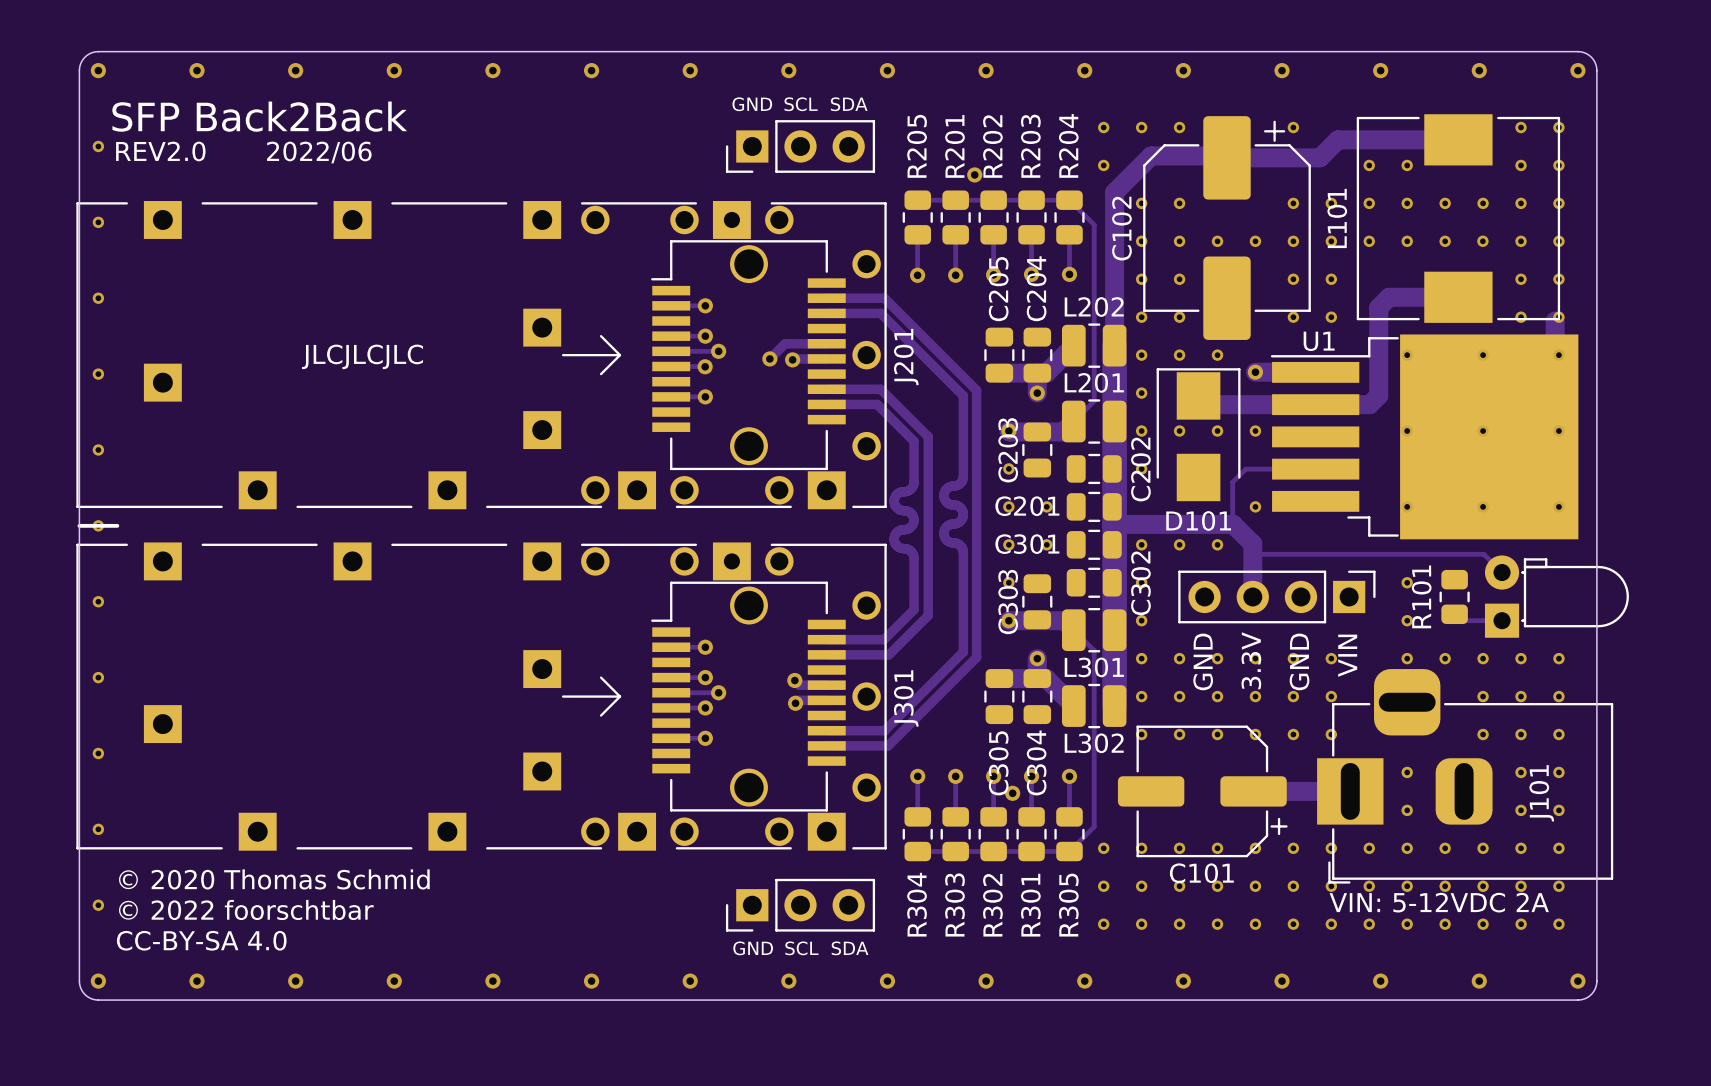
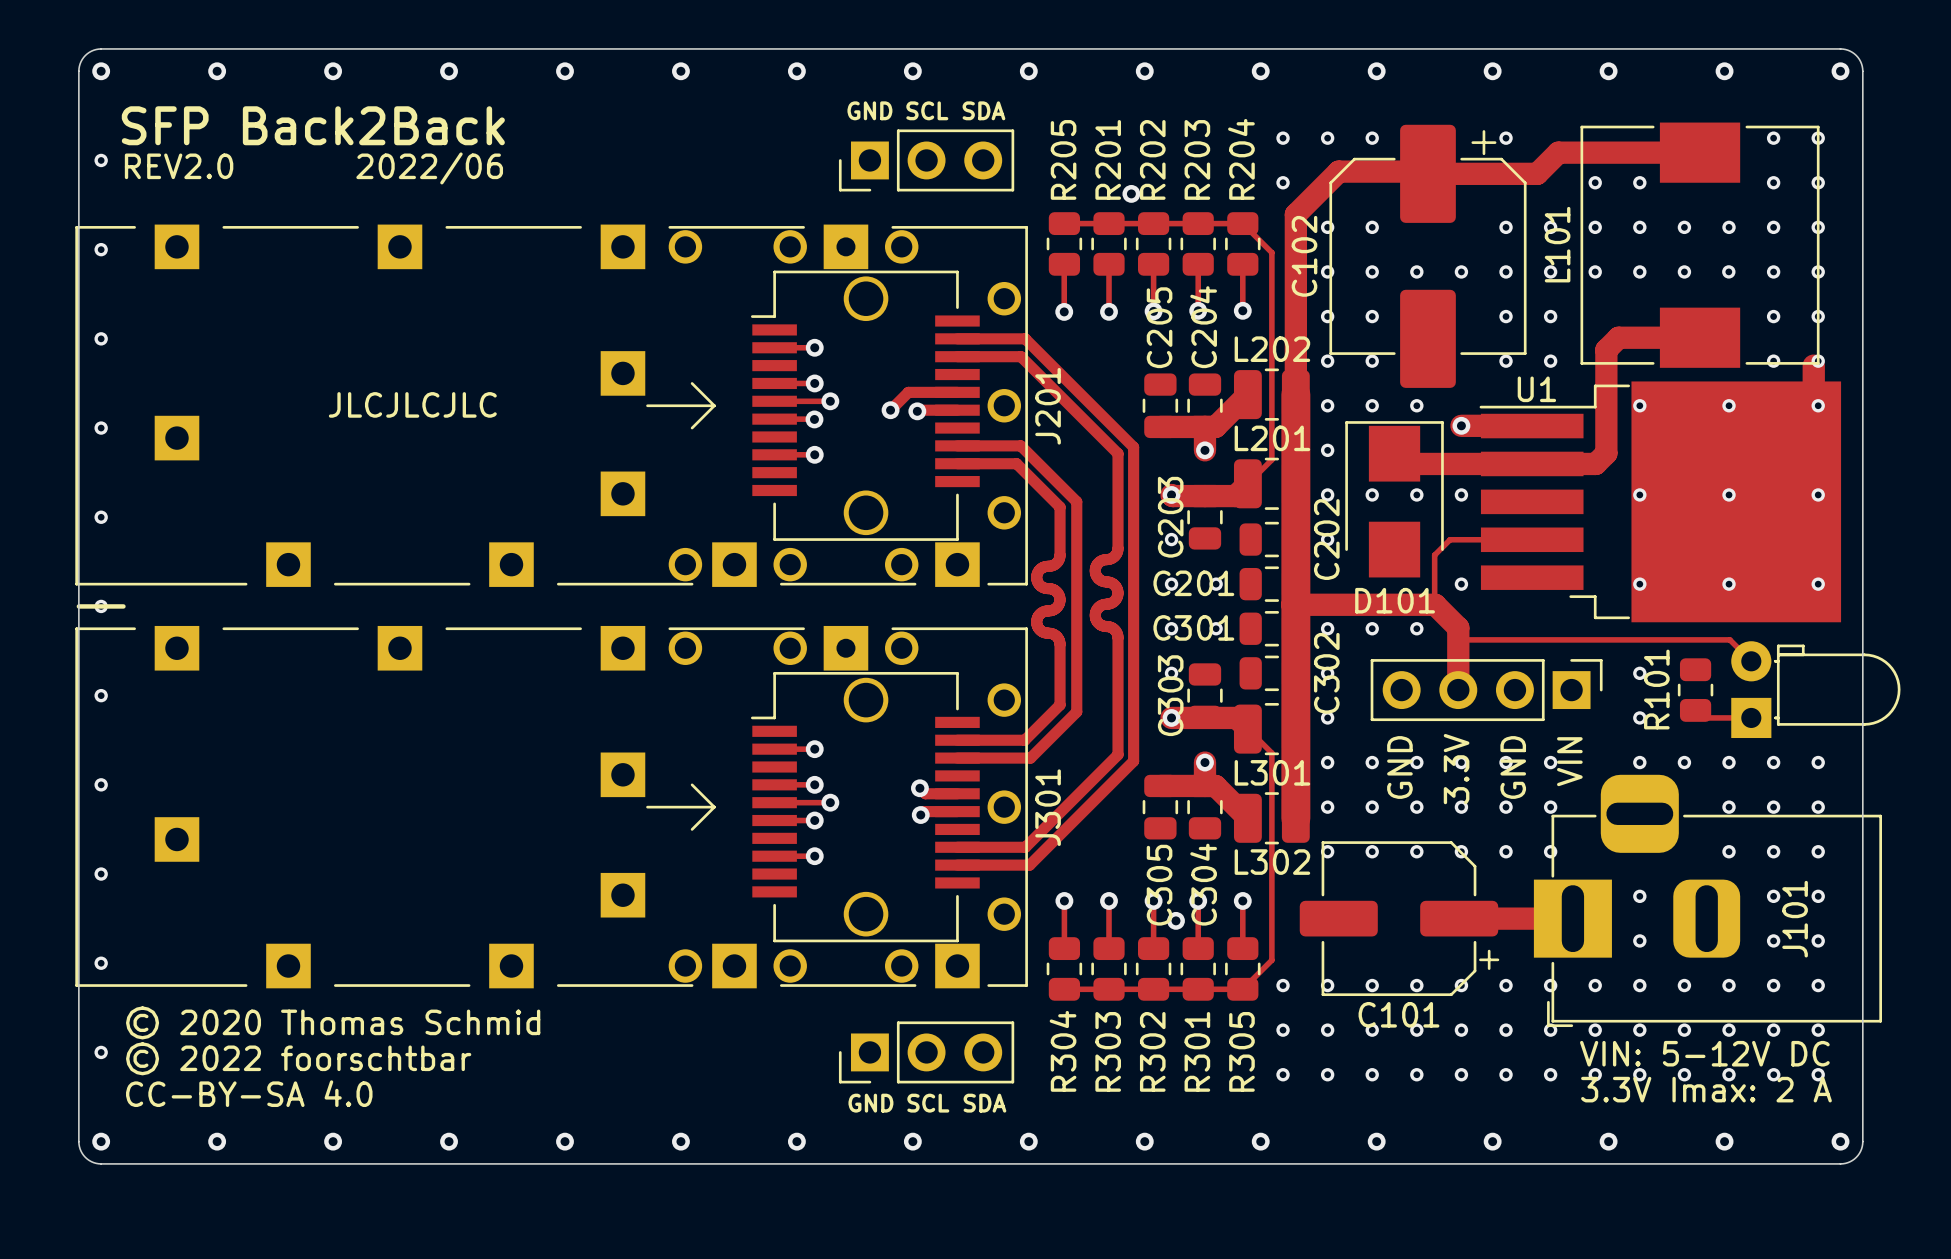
text: VIN: 5-12VDC 2A (1439, 902) -> VIN: 5-12V DC (1704, 1053)
text: none -> 3.3V Imax: 2 A (1706, 1089)

